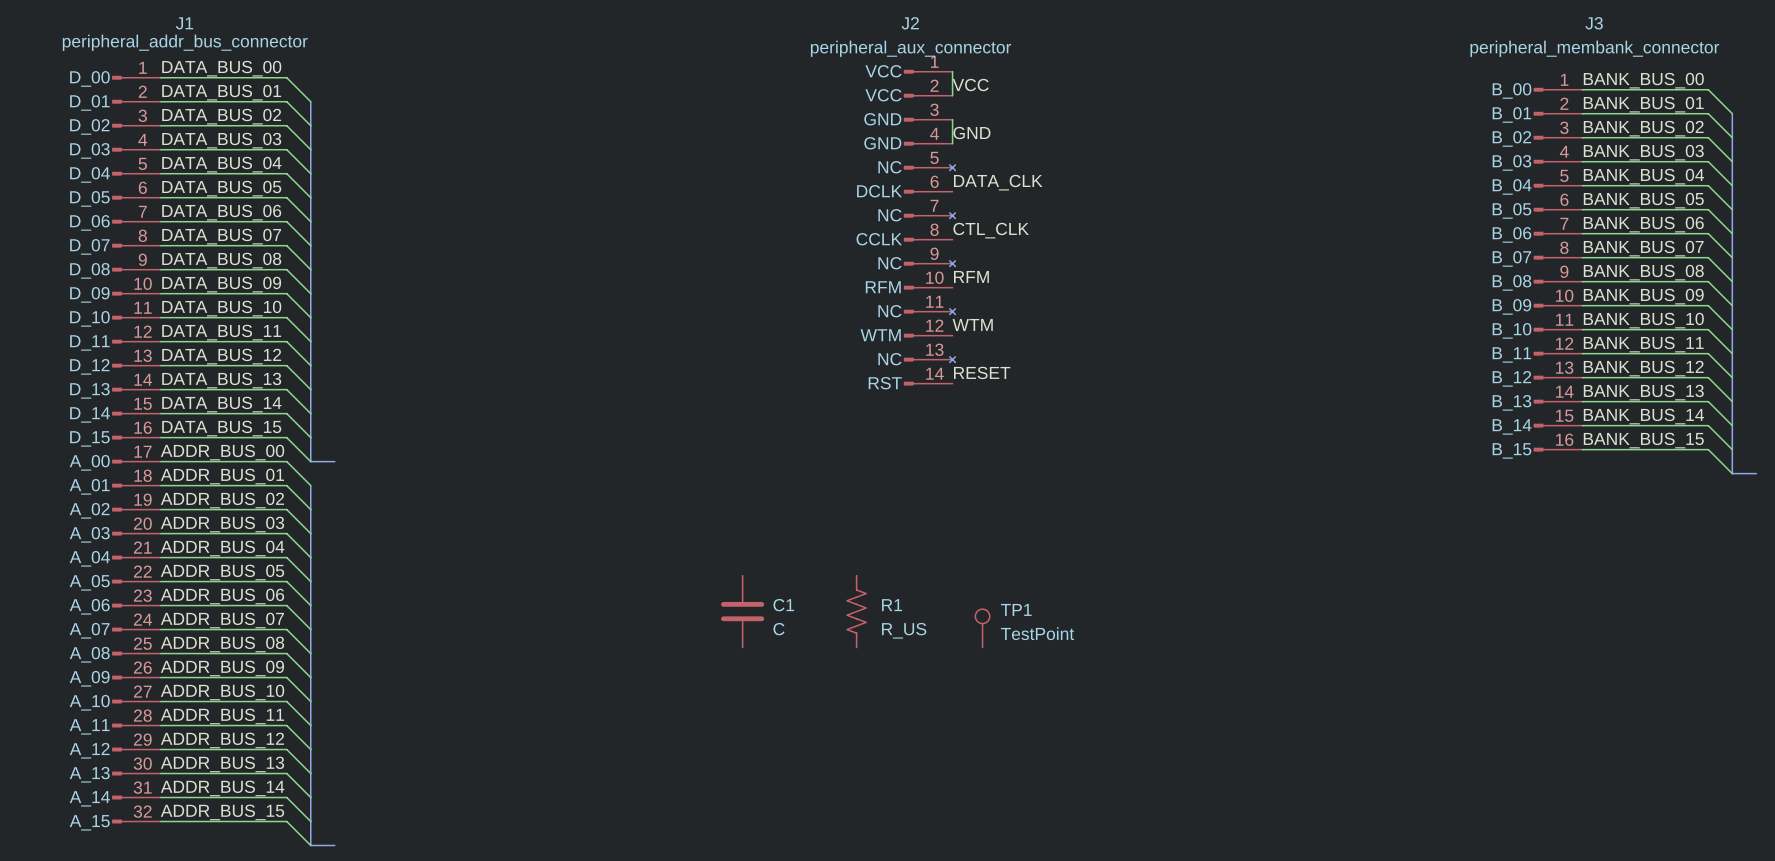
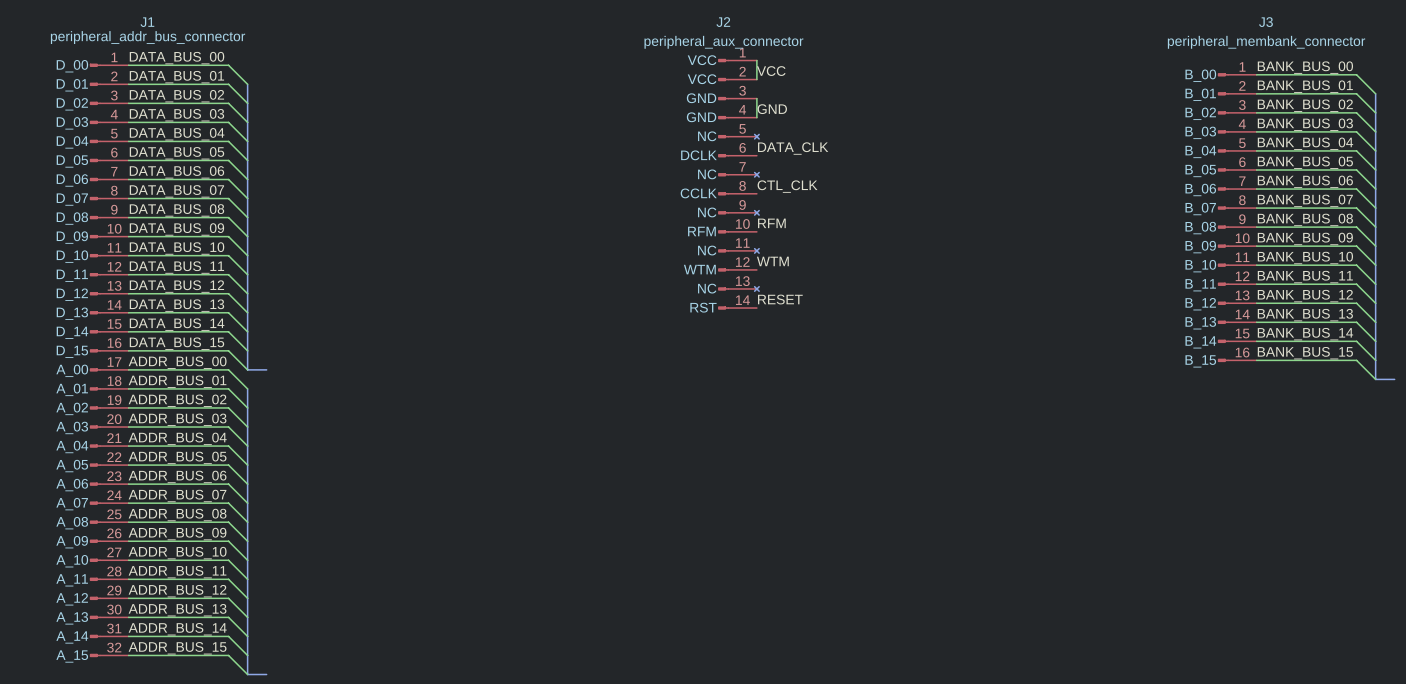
C1: C (742, 611) -> none
R1: R_US (856, 611) -> none
TP1: TestPoint (982, 628) -> none

